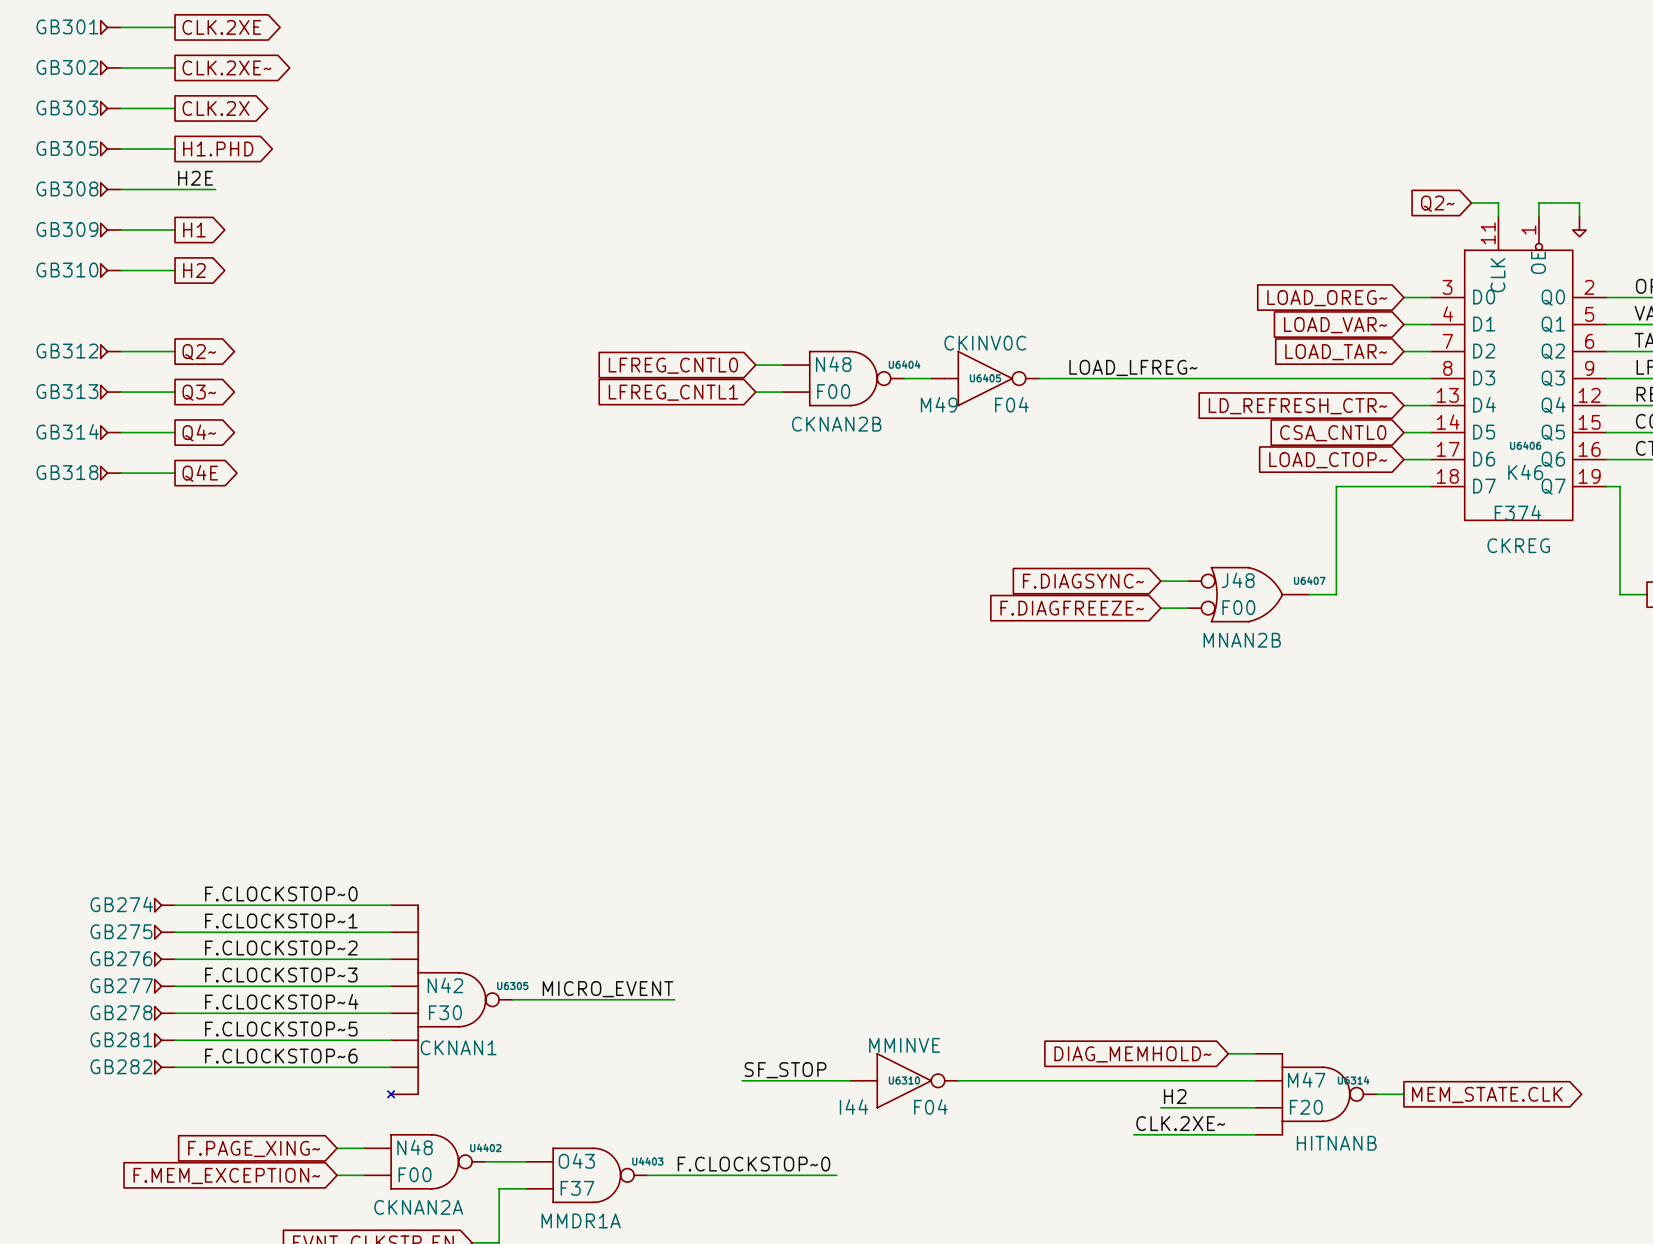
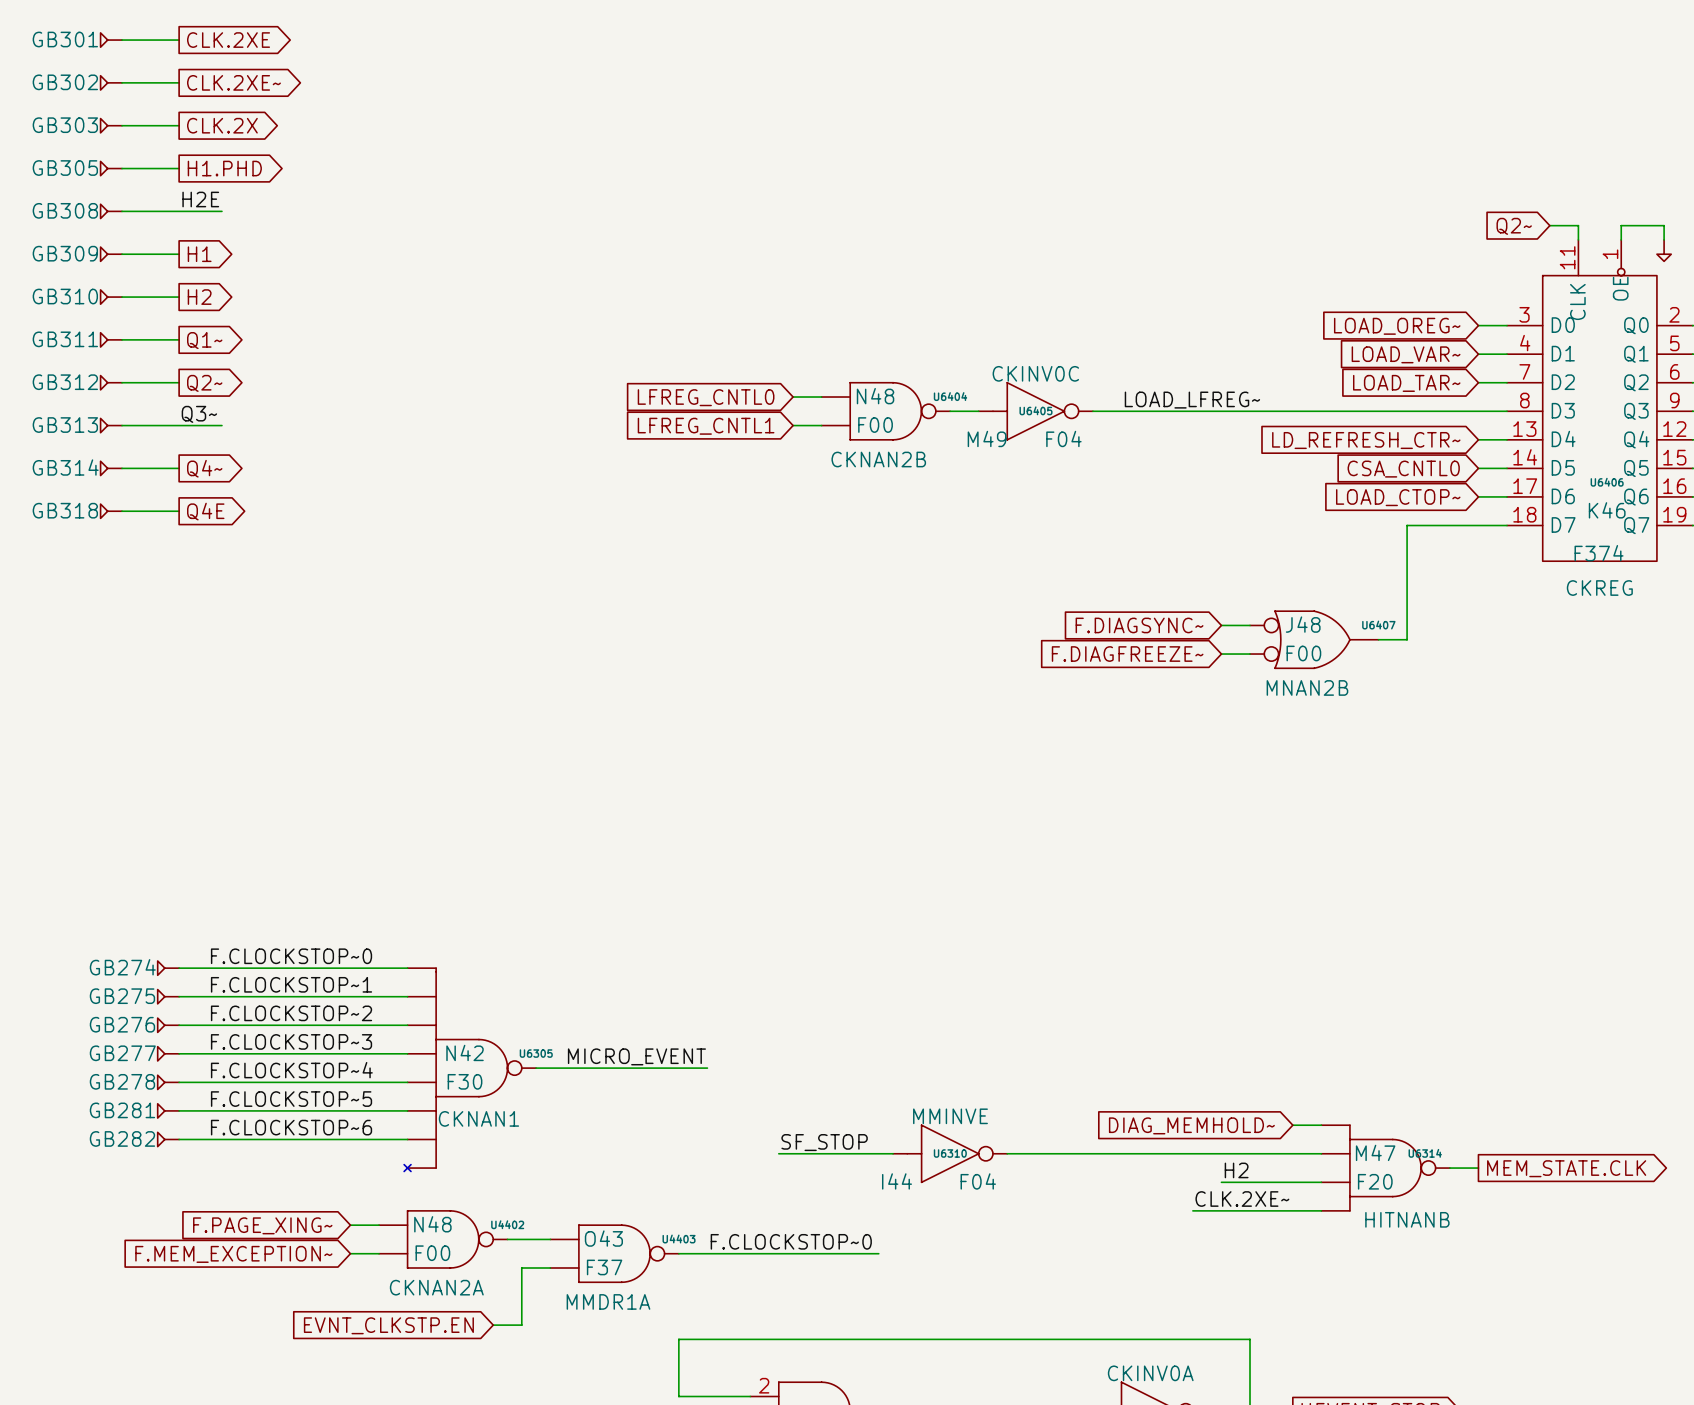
GB311: none -> (111, 339)
wire: none -> (121, 339) (179, 339)
global label: none -> Q1~ (204, 340)
label: none -> Q3~ (199, 414)
wire: none -> (179, 425) (221, 425)
global label: Q3~ (199, 392) -> none

